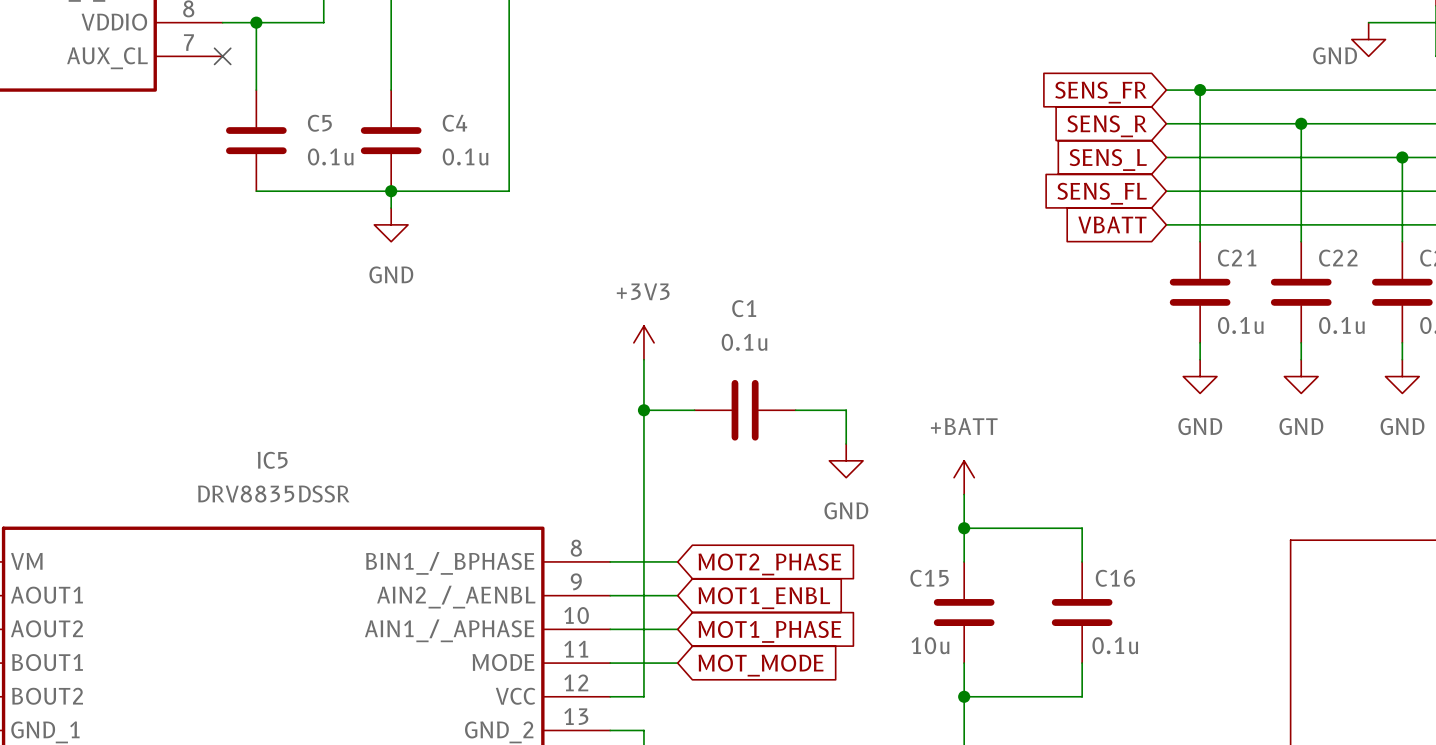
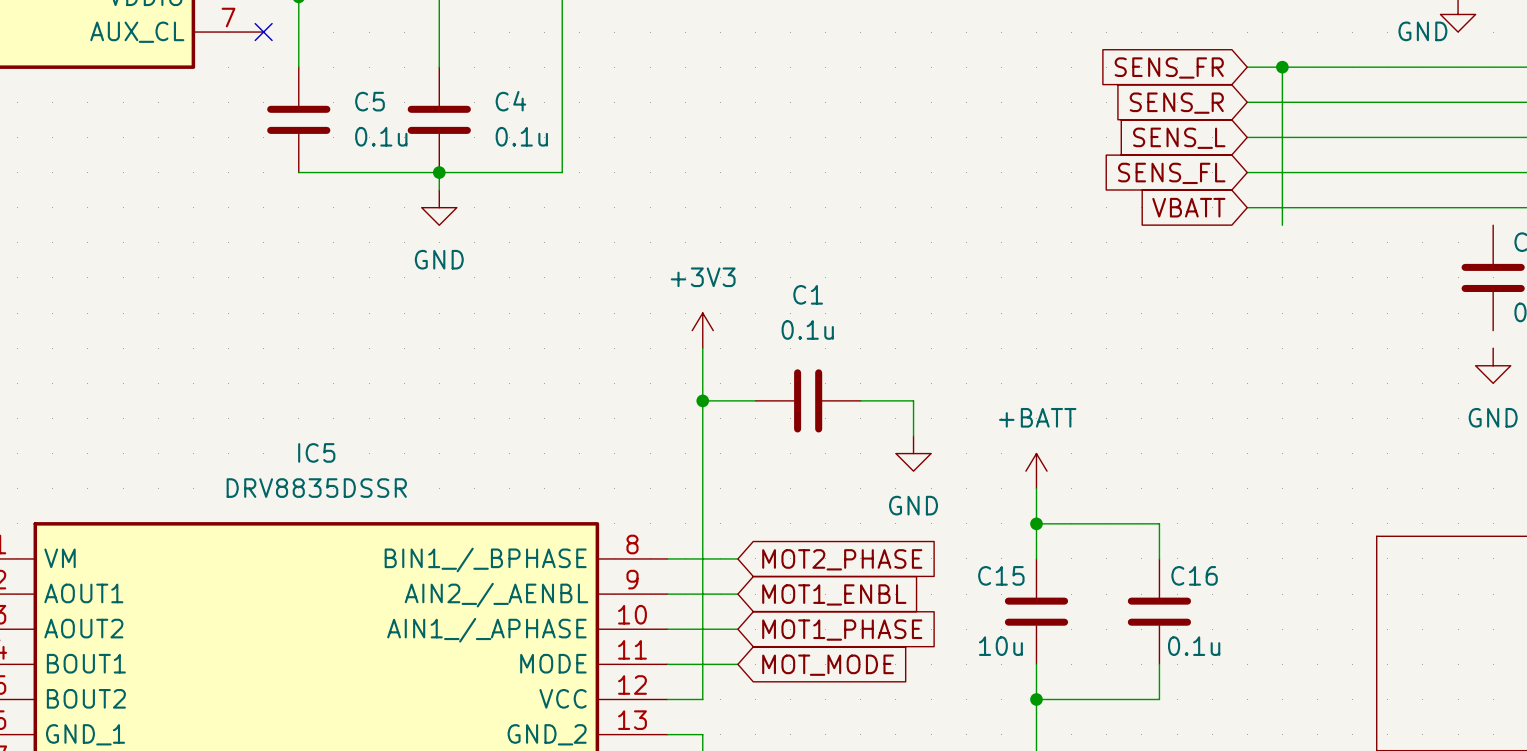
wire: (1301, 123) (1301, 241) -> none
junction: (1301, 123) -> none
wire: (1402, 157) (1402, 241) -> none
junction: (1402, 157) -> none
C21: 0.1u (1200, 292) -> none
C22: 0.1u (1301, 292) -> none
wire: (1200, 342) (1200, 359) -> none
wire: (1301, 342) (1301, 359) -> none
wire: (1402, 342) (1402, 359) -> none
power symbol: GND (1200, 376) -> none
power symbol: GND (1301, 376) -> none

